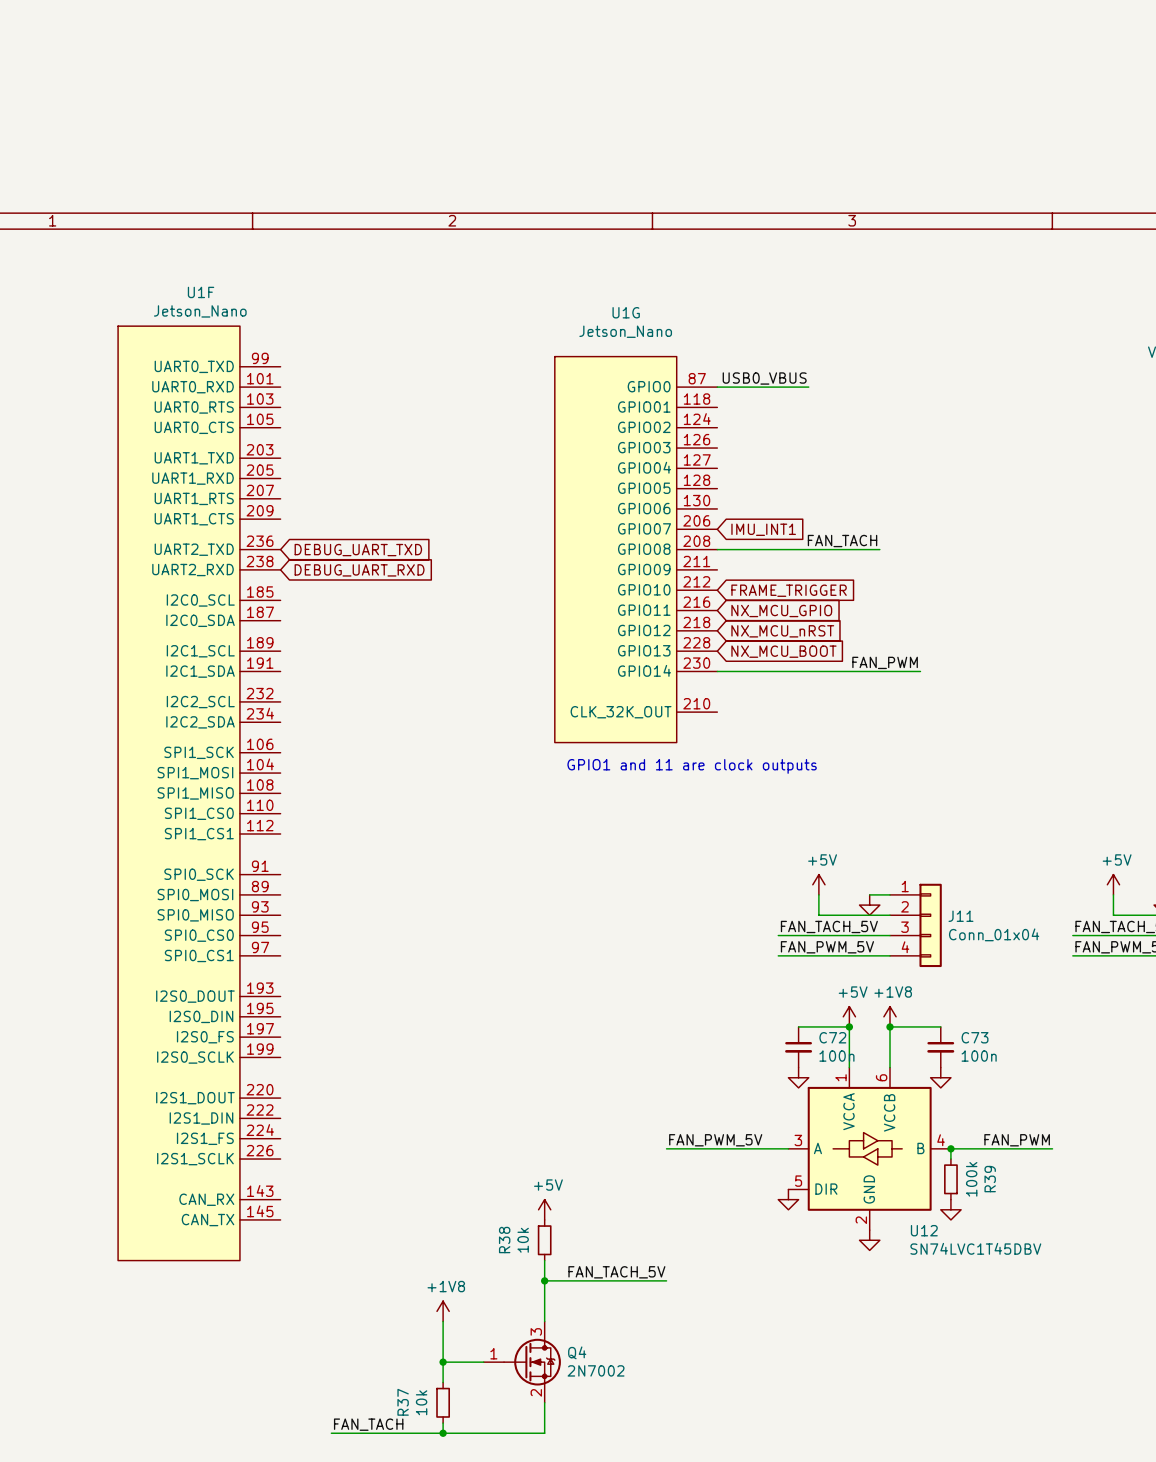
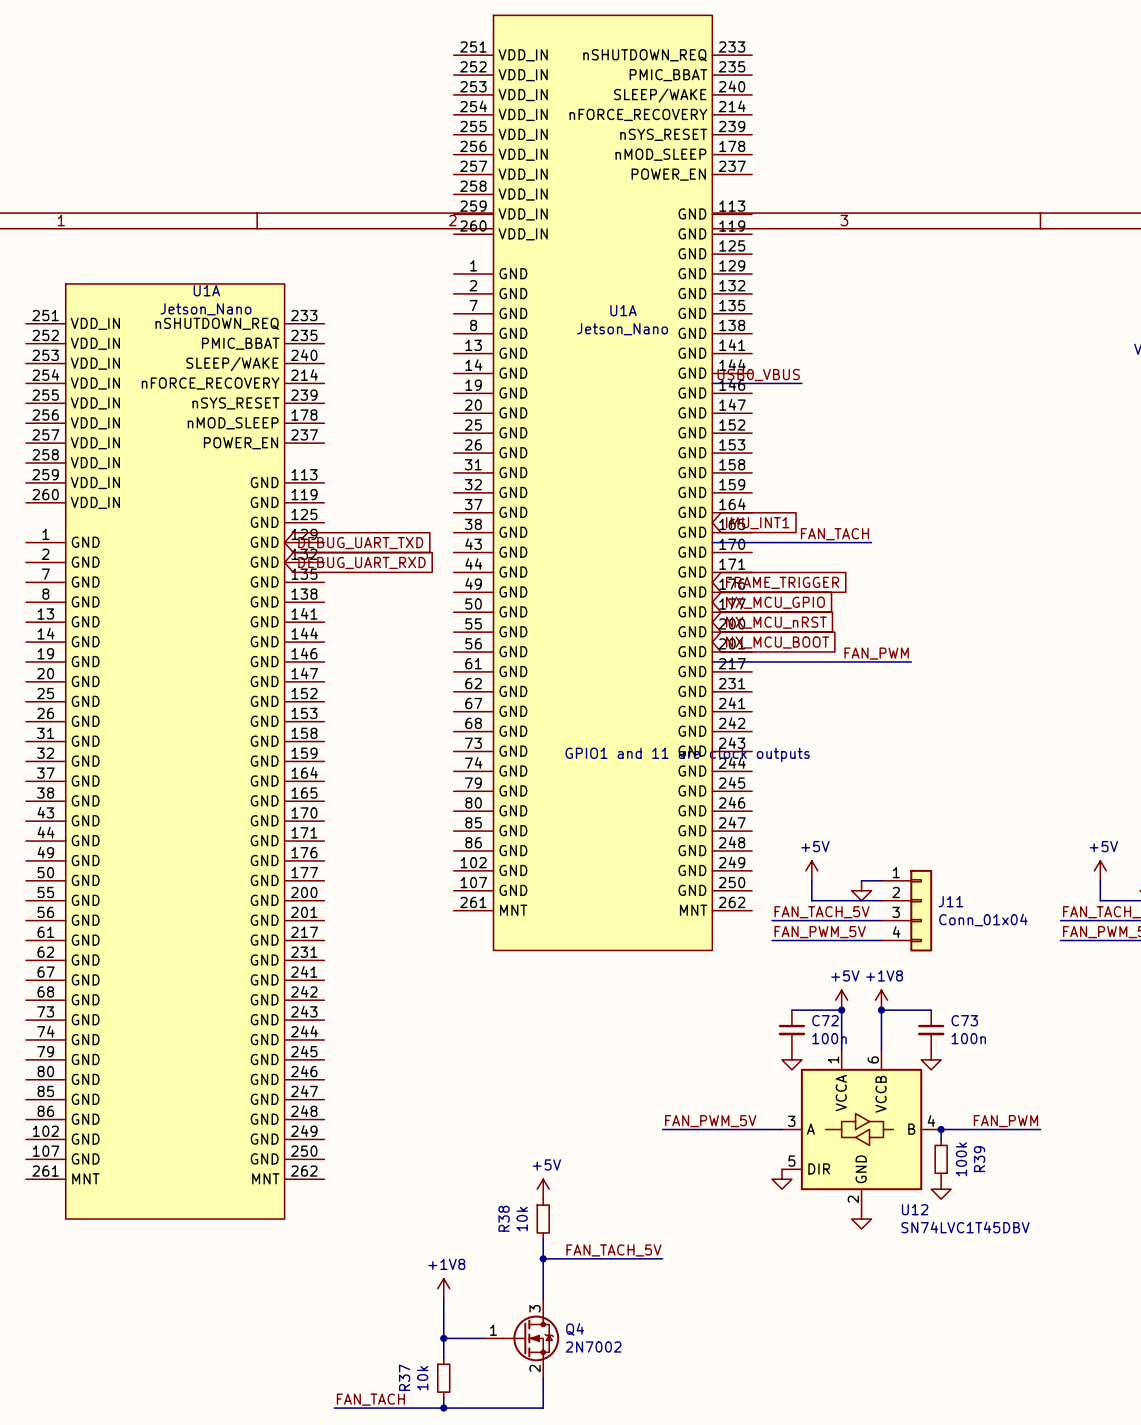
U1A: none -> Jetson_Nano (602, 482)
U1G: Jetson_Nano (636, 549) -> none
U1A: none -> Jetson_Nano (175, 751)
U1F: Jetson_Nano (199, 793) -> none

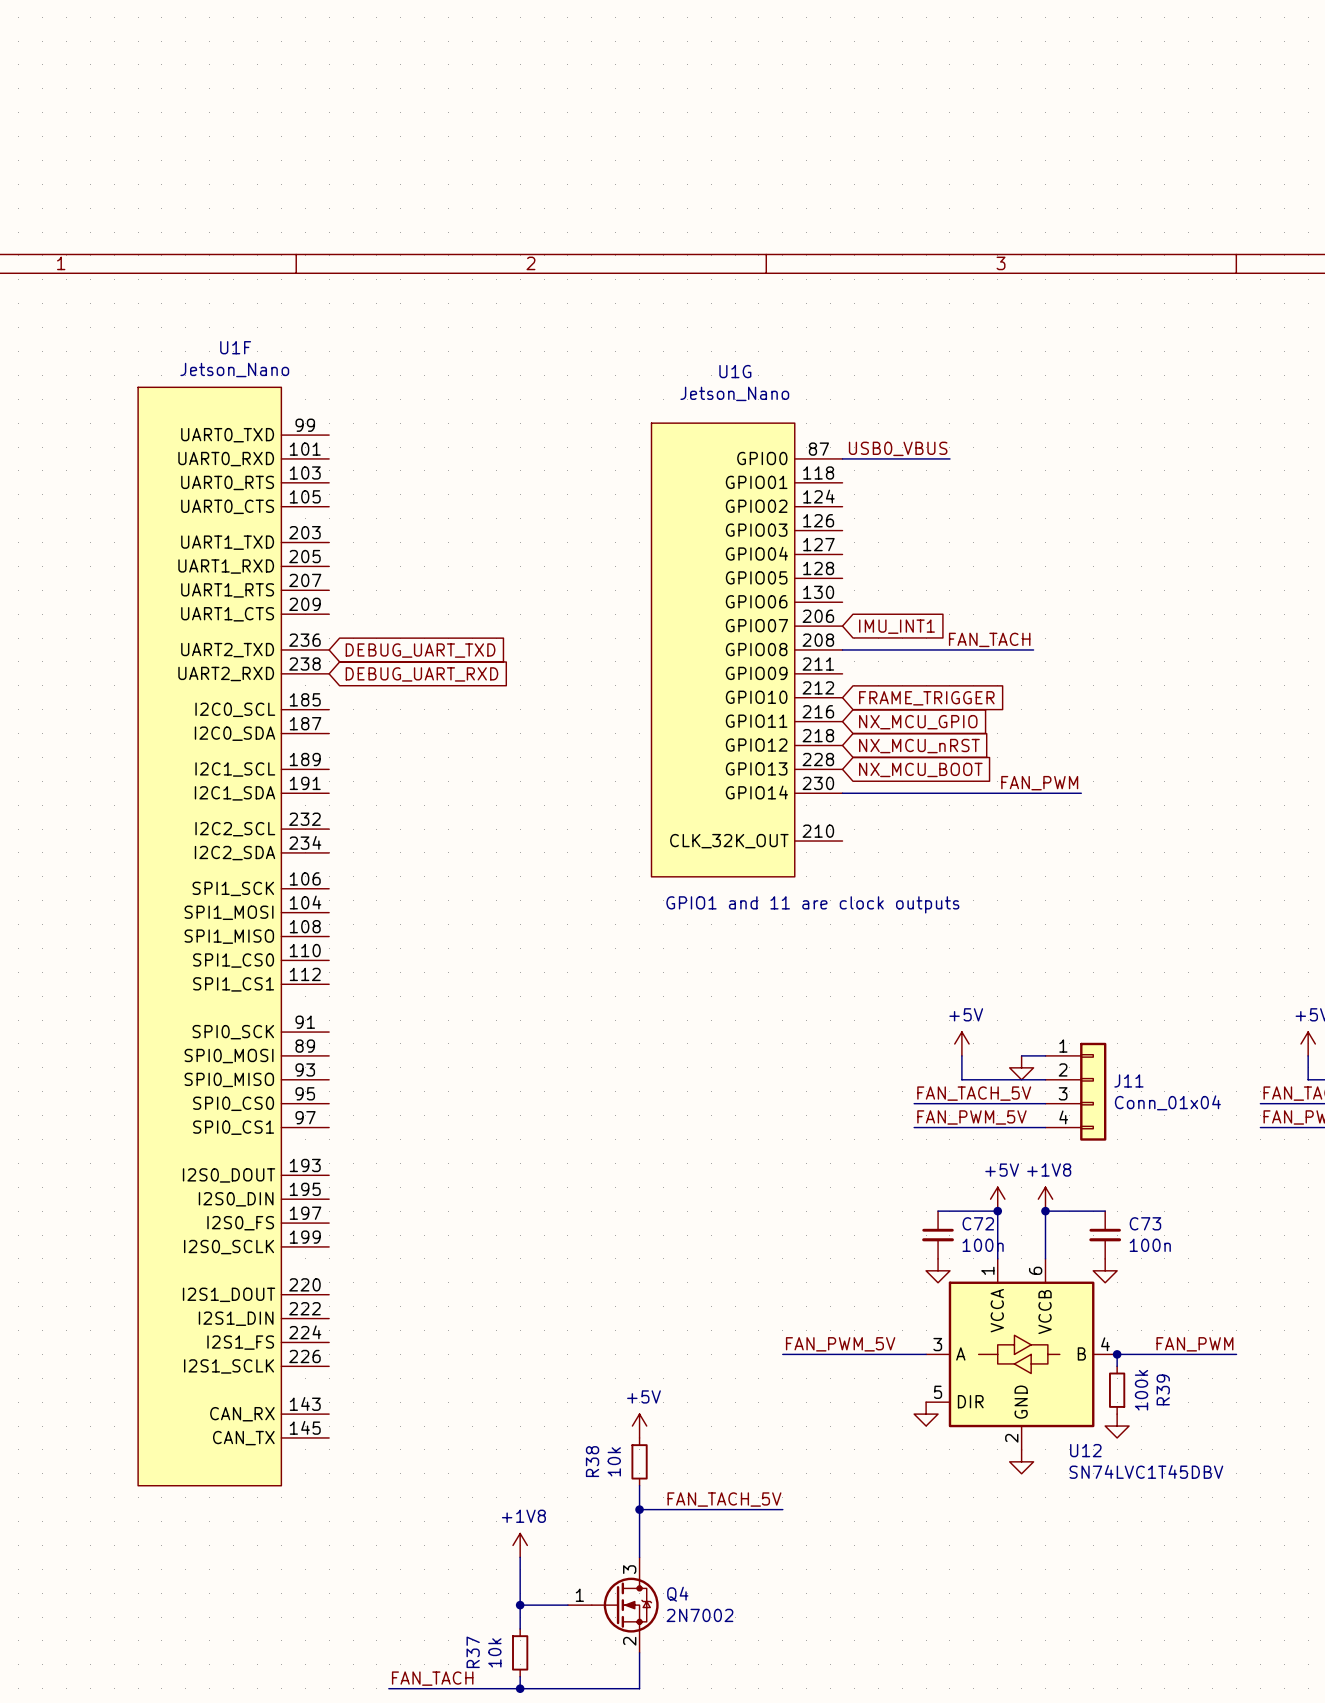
U1A: Jetson_Nano (602, 482) -> none
U1G: none -> Jetson_Nano (747, 649)
U1A: Jetson_Nano (175, 751) -> none
U1F: none -> Jetson_Nano (233, 936)

